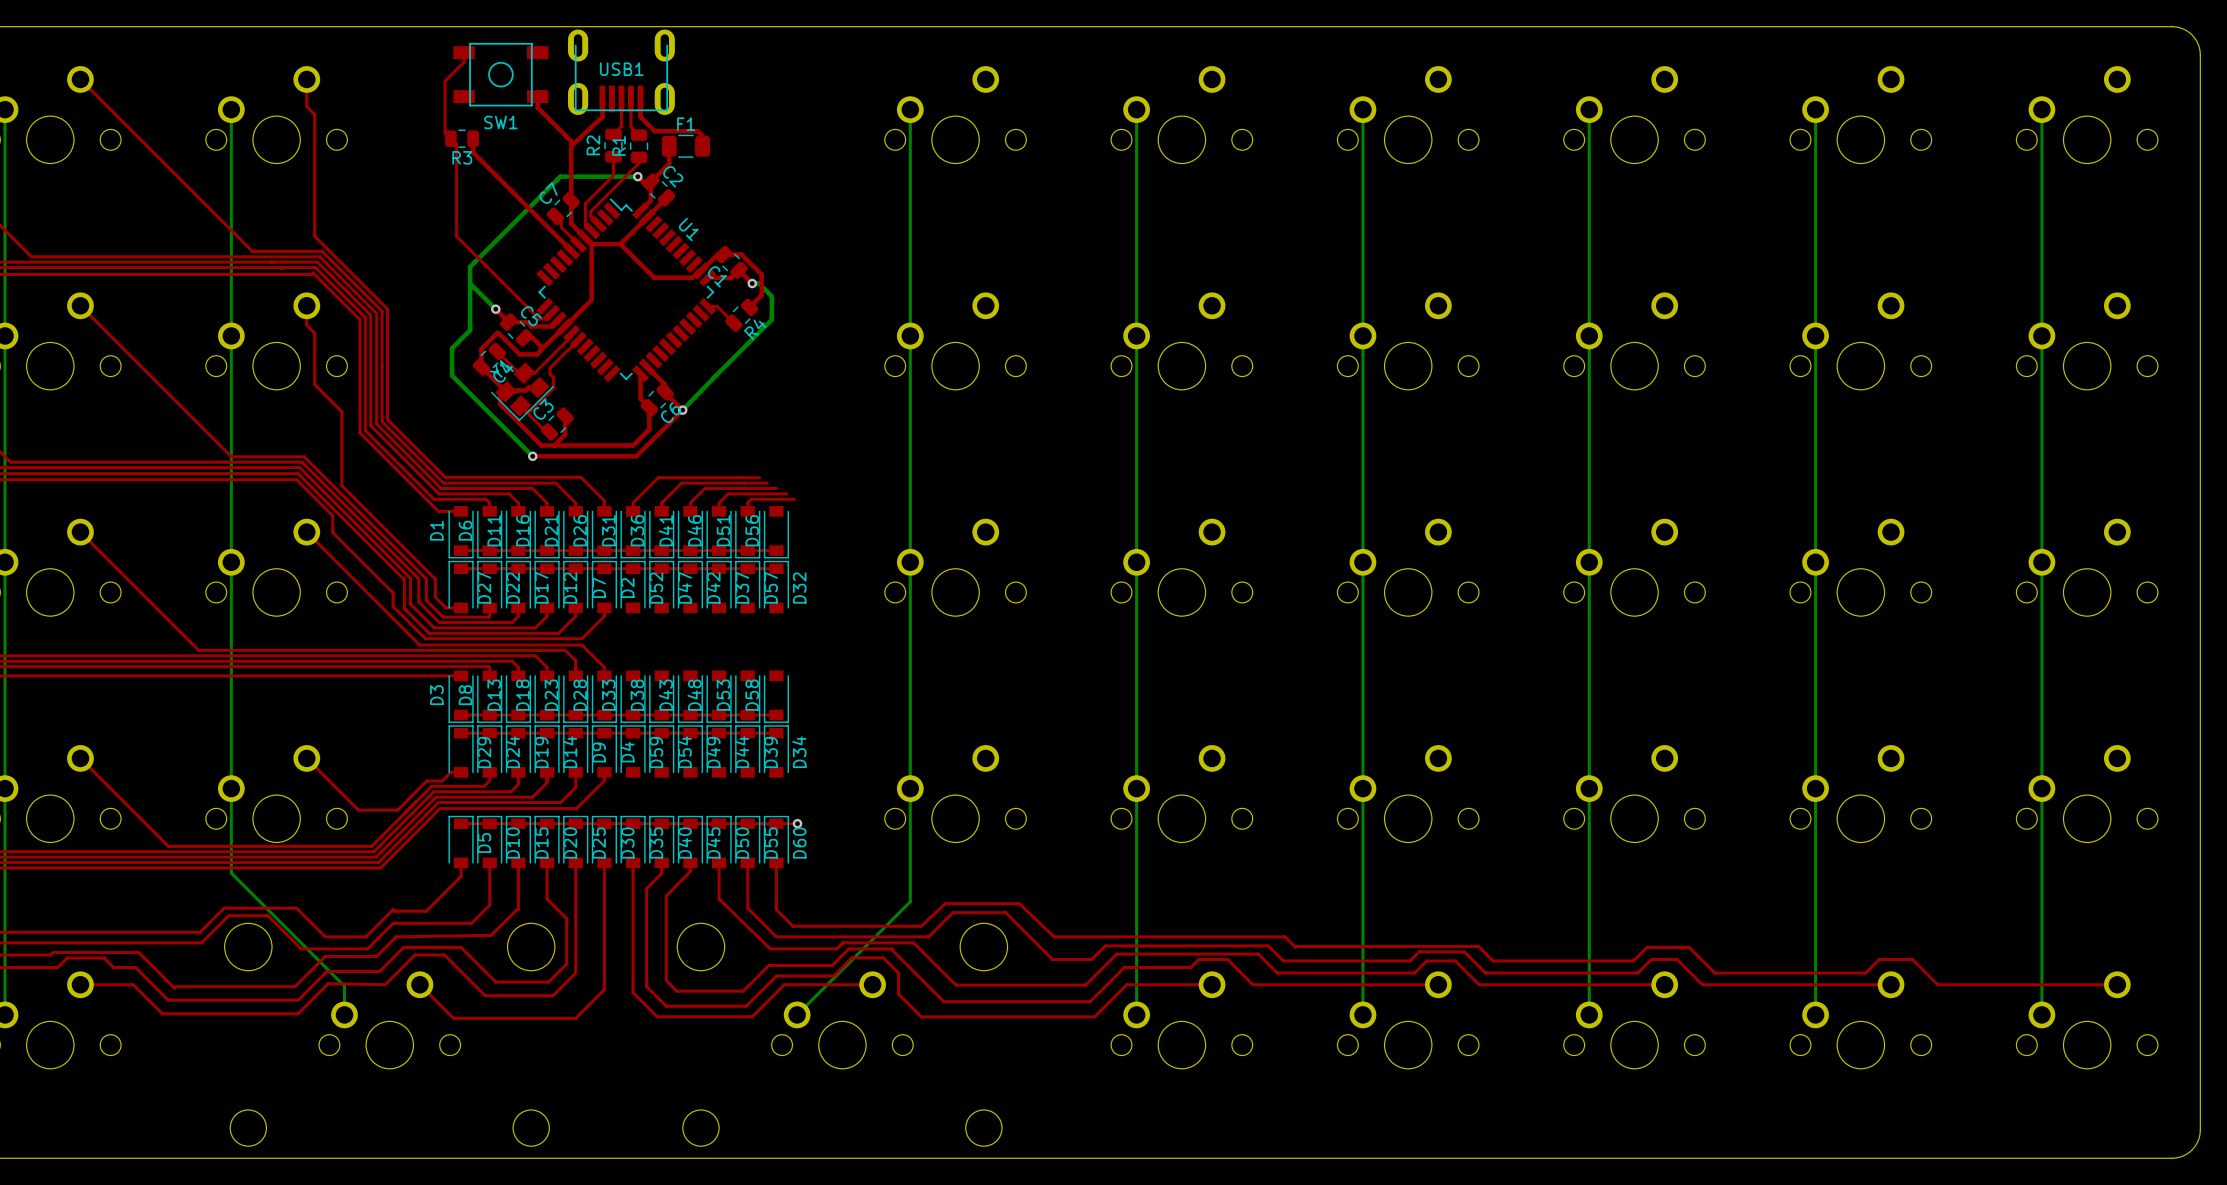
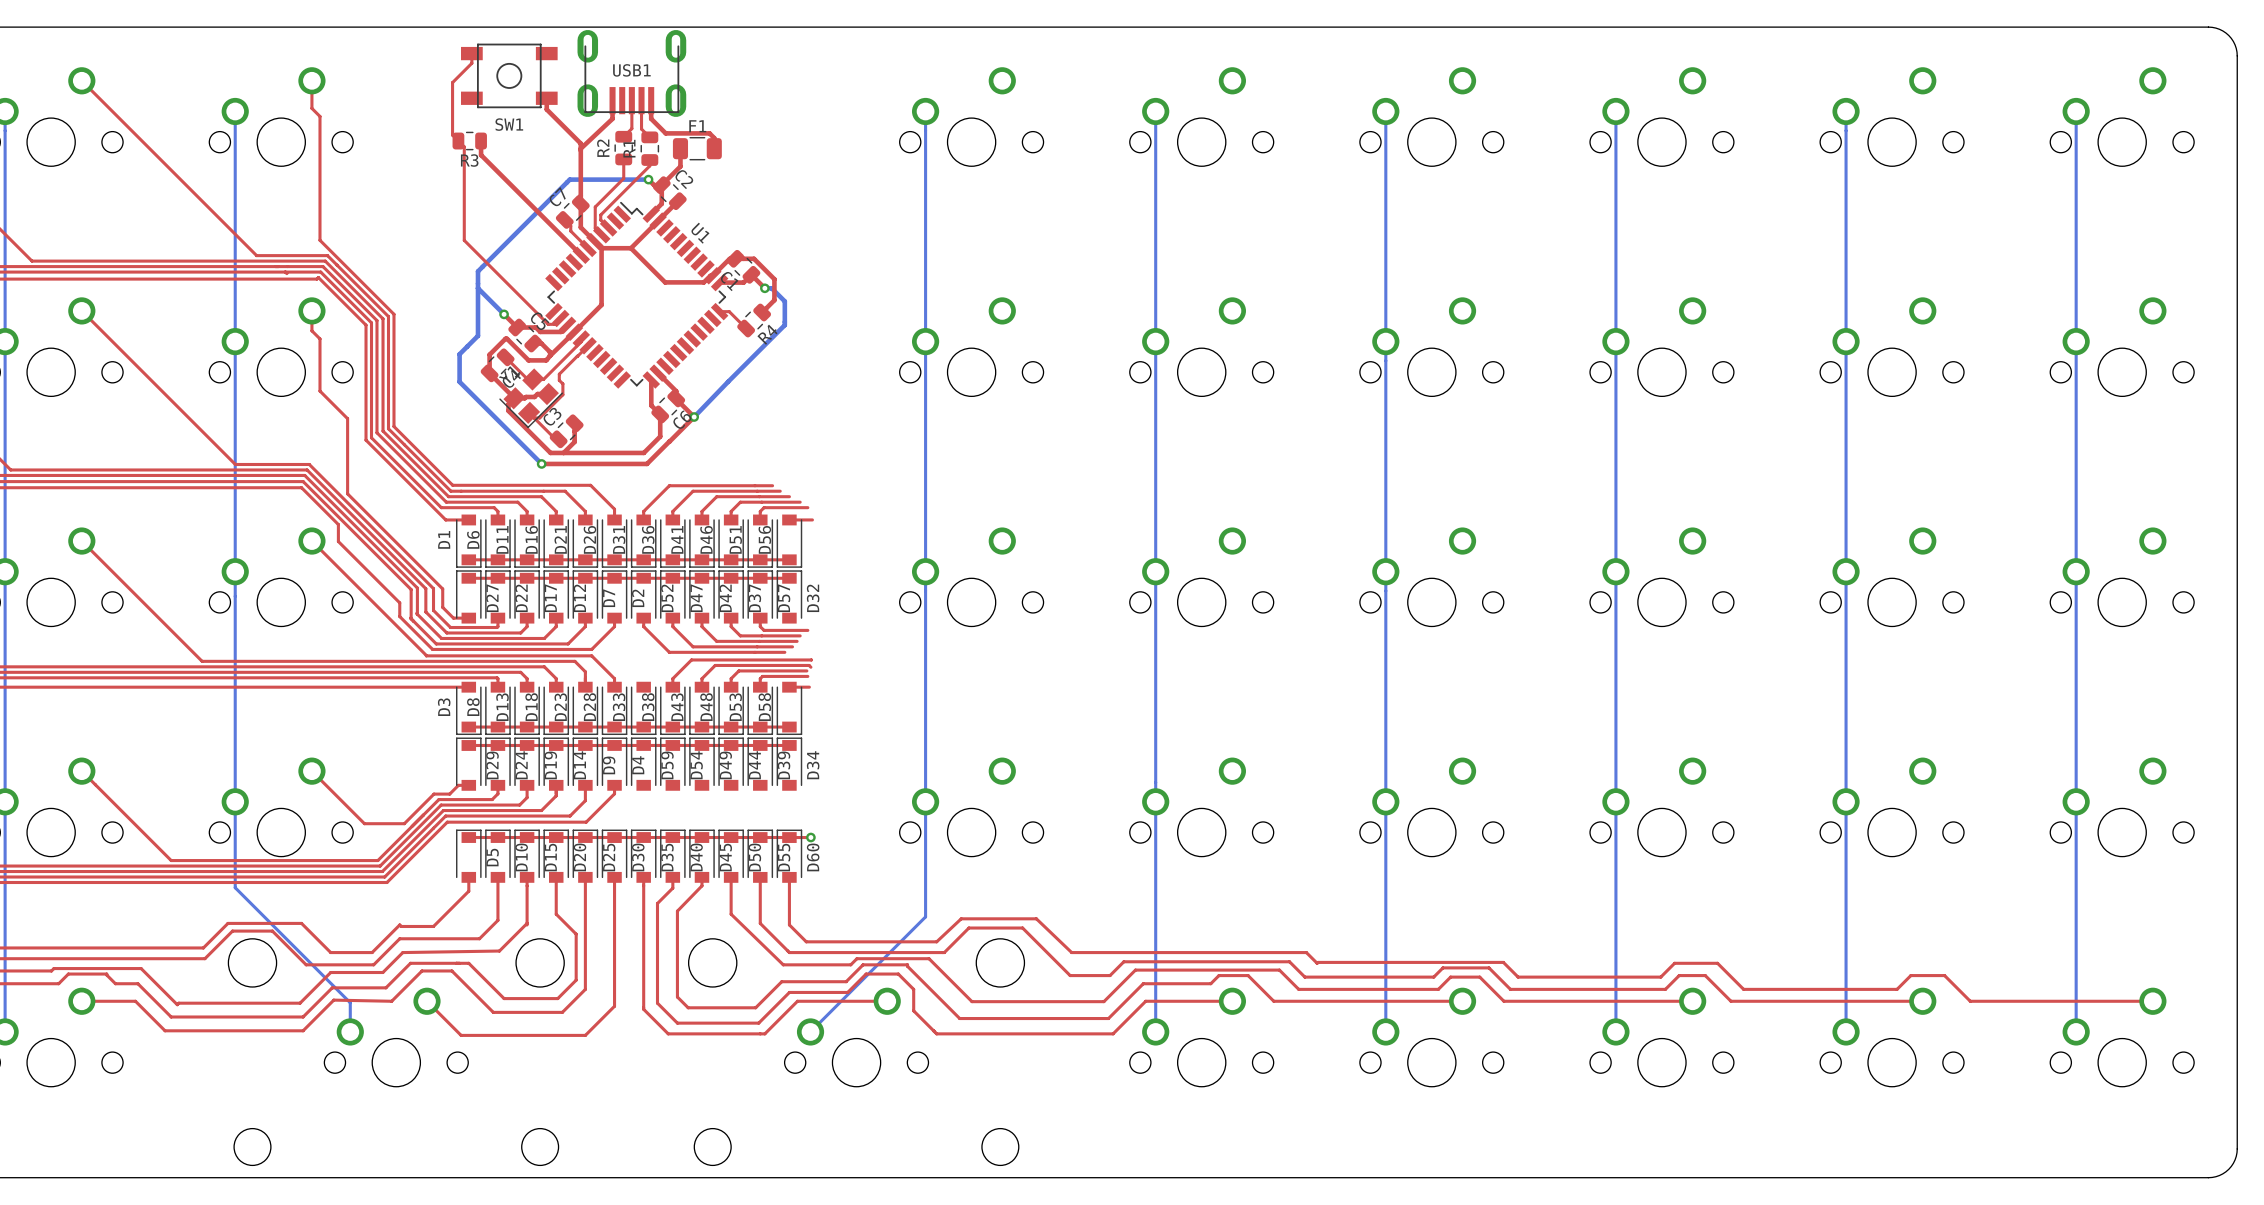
top track: none -> (789, 519) (812, 519)
top track: none -> (643, 618) (643, 626) (669, 652) (784, 652)
top track: none -> (672, 618) (672, 626) (693, 646) (792, 646)
top track: none -> (701, 618) (701, 626) (716, 641) (797, 641)
top track: none -> (731, 618) (731, 626) (740, 635) (800, 635)
top track: none -> (760, 618) (760, 626) (764, 630) (807, 630)
top track: none -> (811, 659) (691, 659) (672, 678) (672, 687)
top track: none -> (810, 667) (809, 665) (715, 665) (701, 678) (701, 687)
top track: none -> (806, 670) (738, 670) (731, 678) (731, 687)
top track: none -> (807, 676) (762, 676) (760, 678) (760, 687)
top track: none -> (789, 687) (809, 687)

